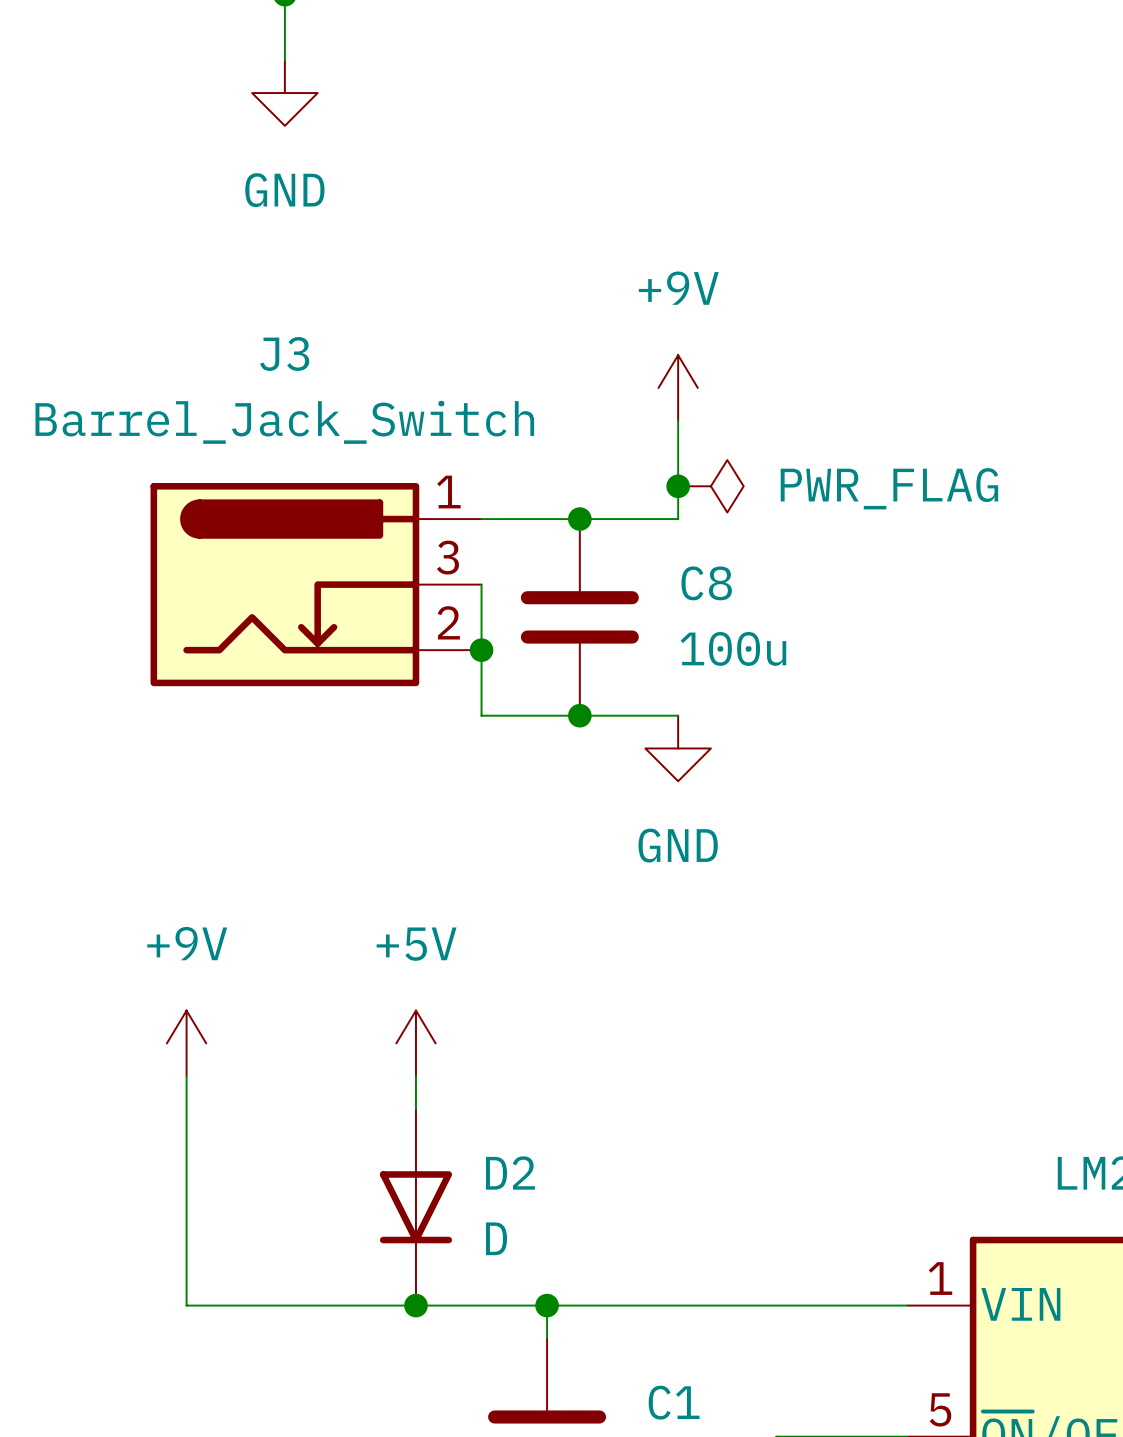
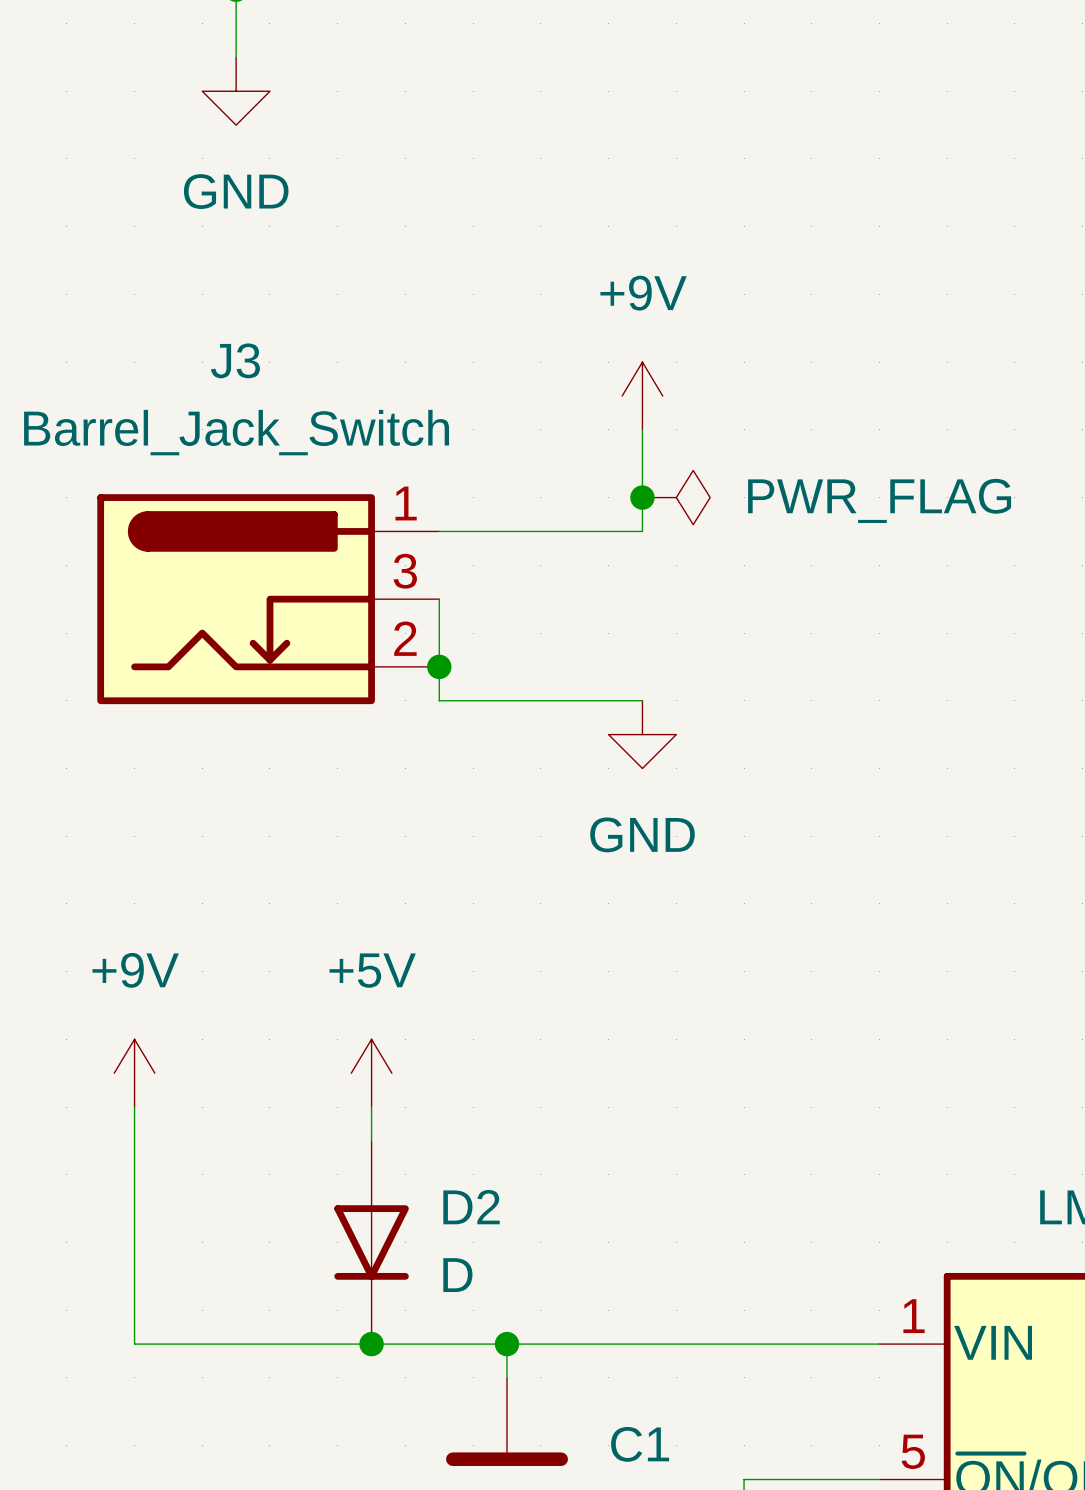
junction: (579, 519) -> none
C8: 100u (579, 617) -> none
wire: (481, 682) (481, 715) (678, 715) -> (439, 700) (642, 700)
junction: (579, 715) -> none
power symbol position: GND (678, 748) -> GND (642, 734)

